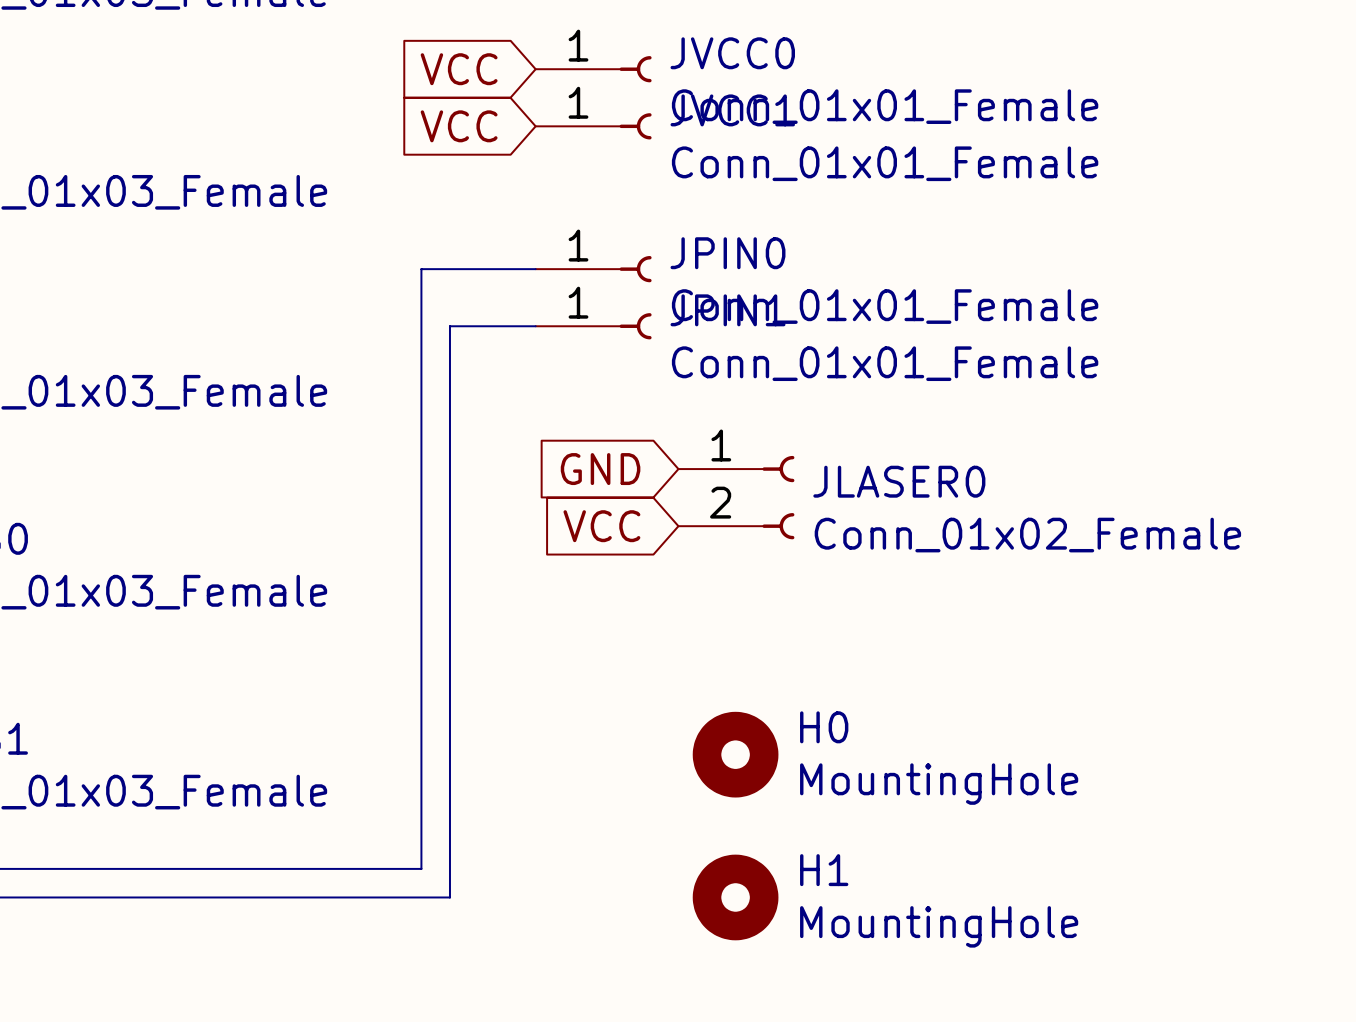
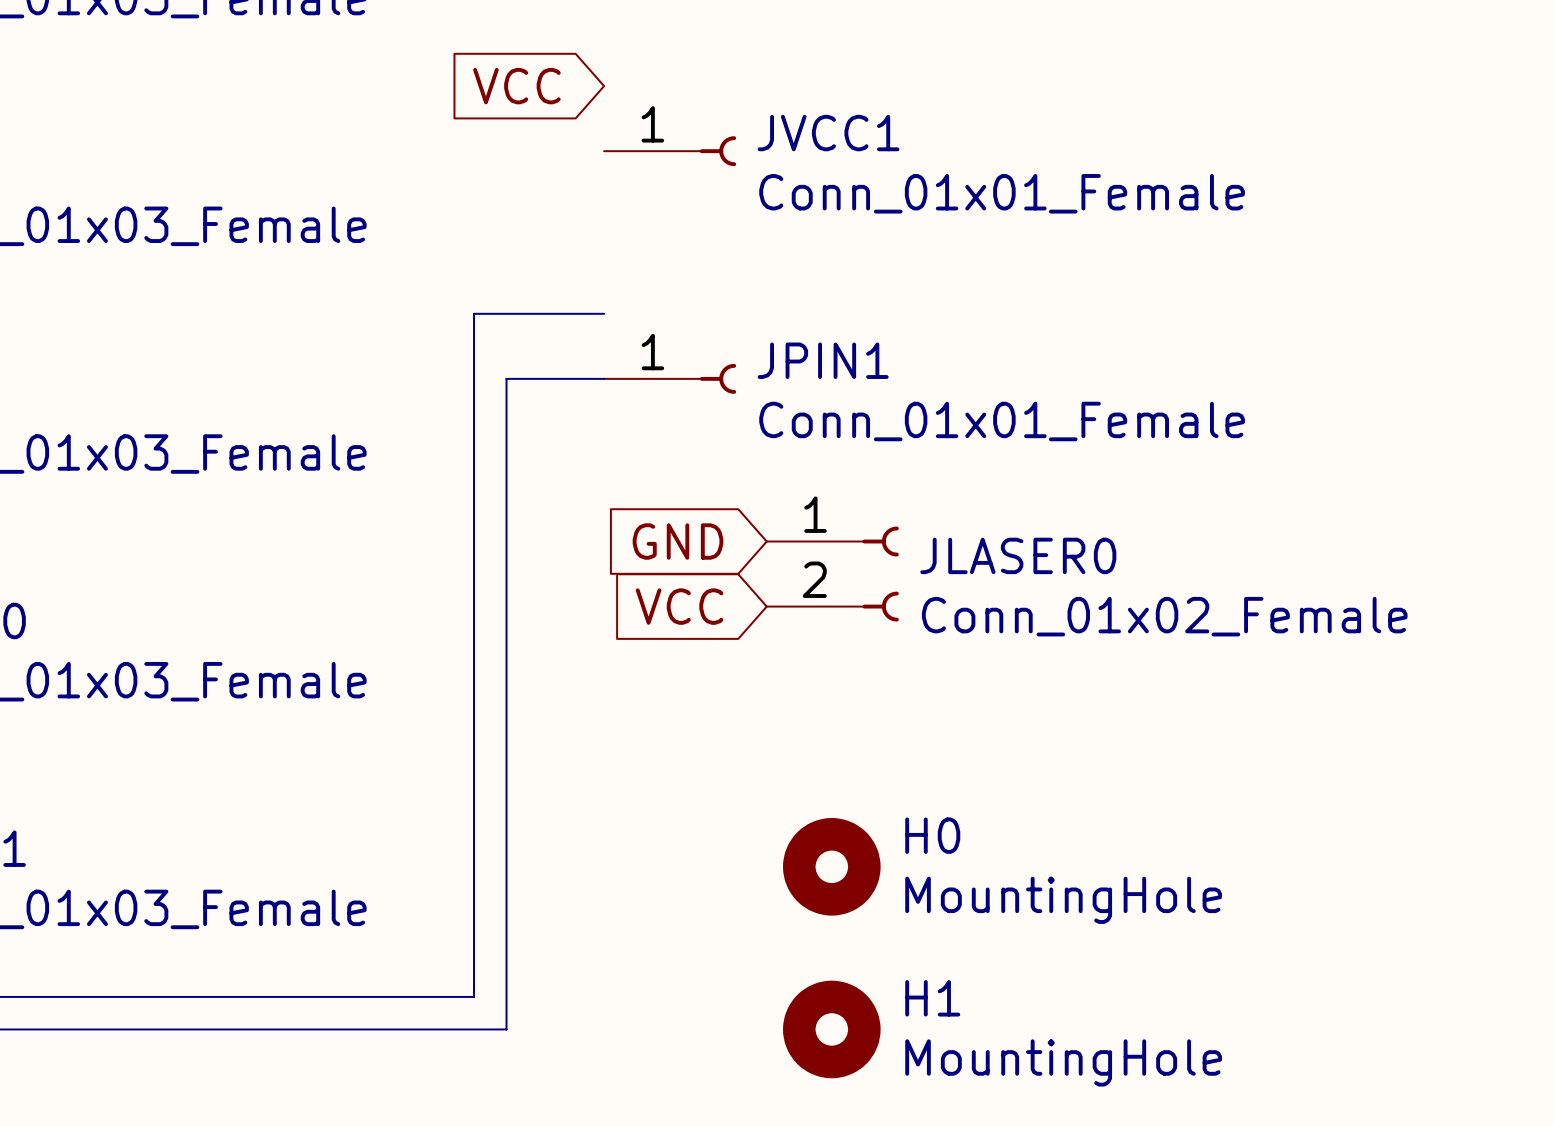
JVCC0: Conn_01x01_Female (593, 69) -> none
global label: VCC (459, 126) -> none
JPIN0: Conn_01x01_Female (593, 269) -> none

